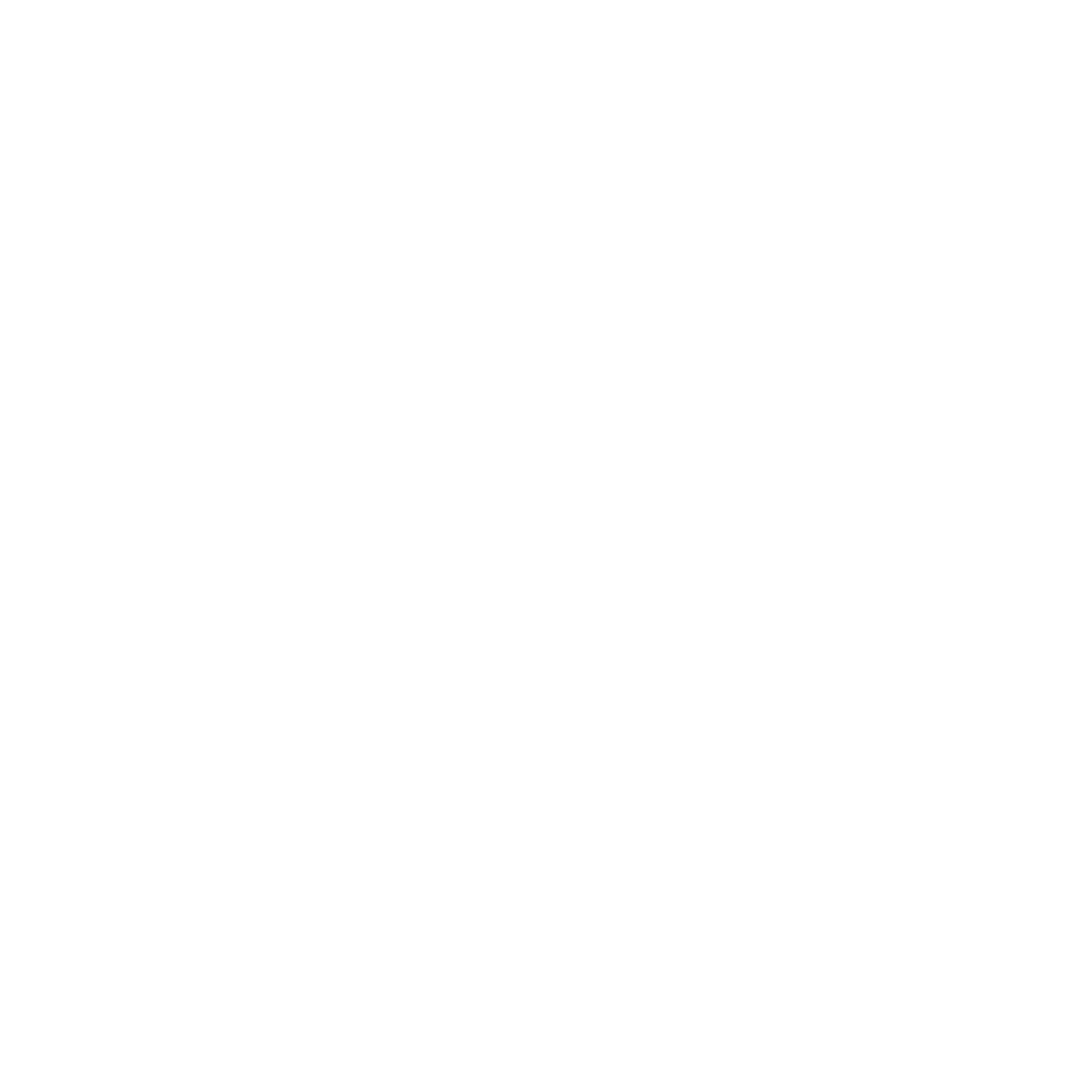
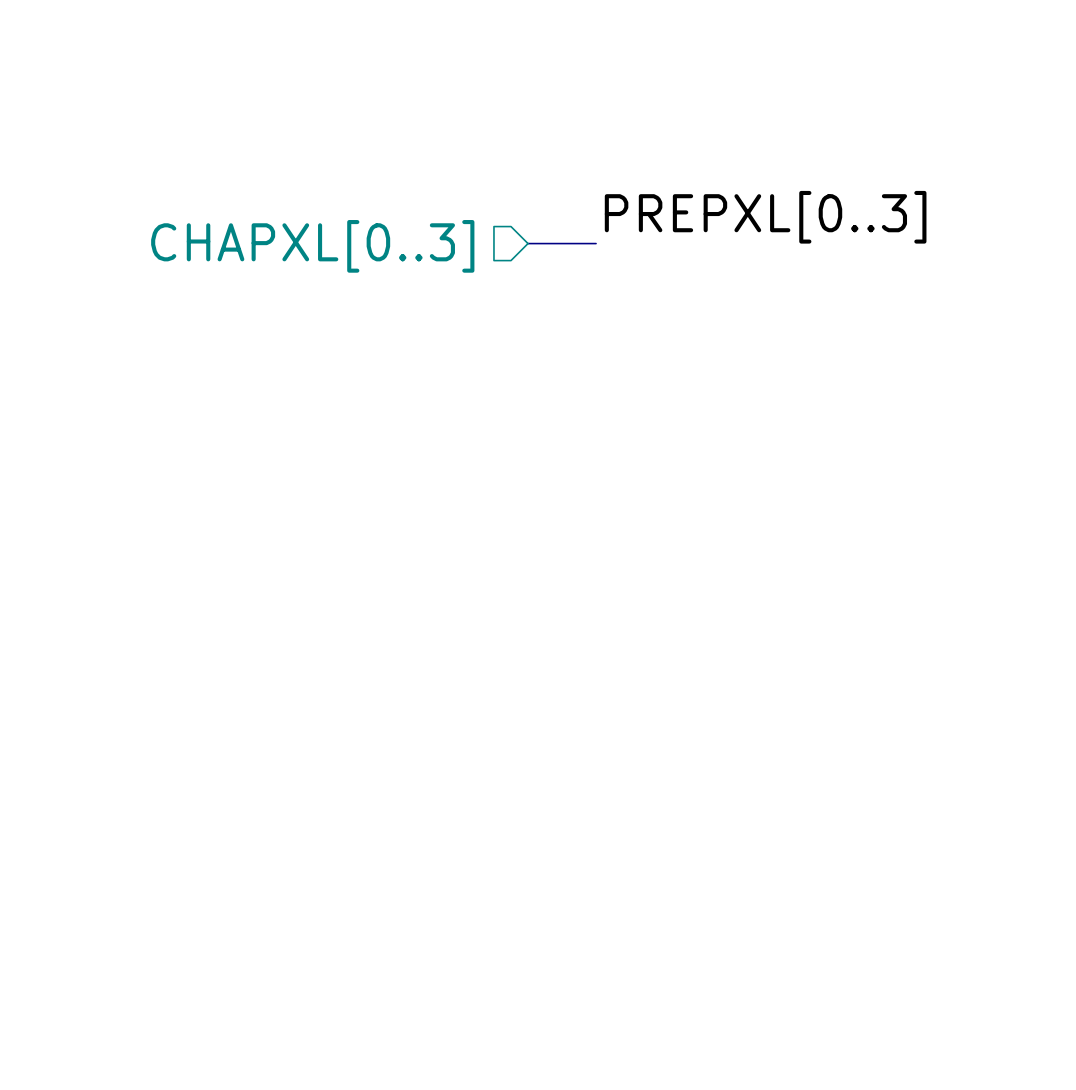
label: none -> PREPXL[0..3] (765, 217)
bus: none -> (528, 243) (596, 243)
sheet pin: none -> CHAPXL[0..3] (312, 246)

